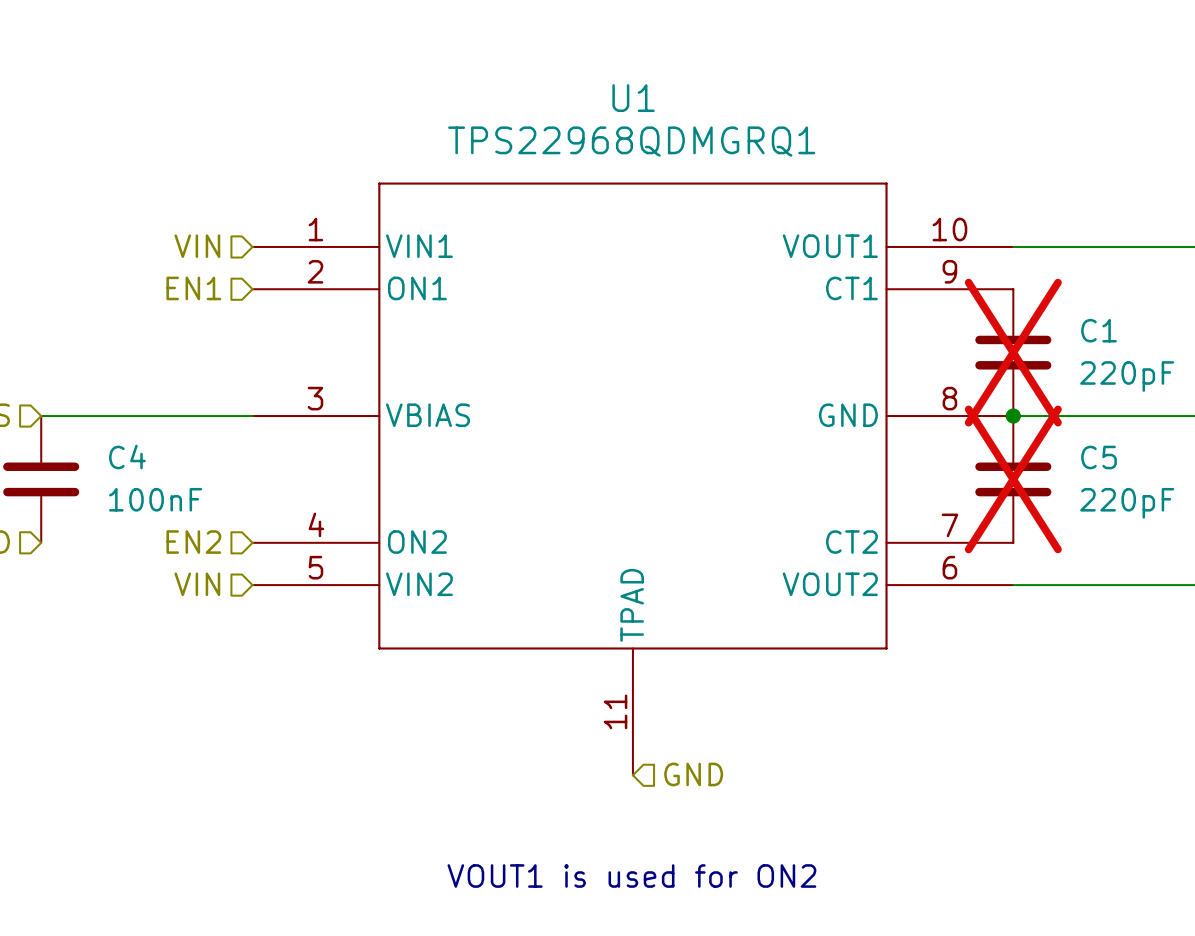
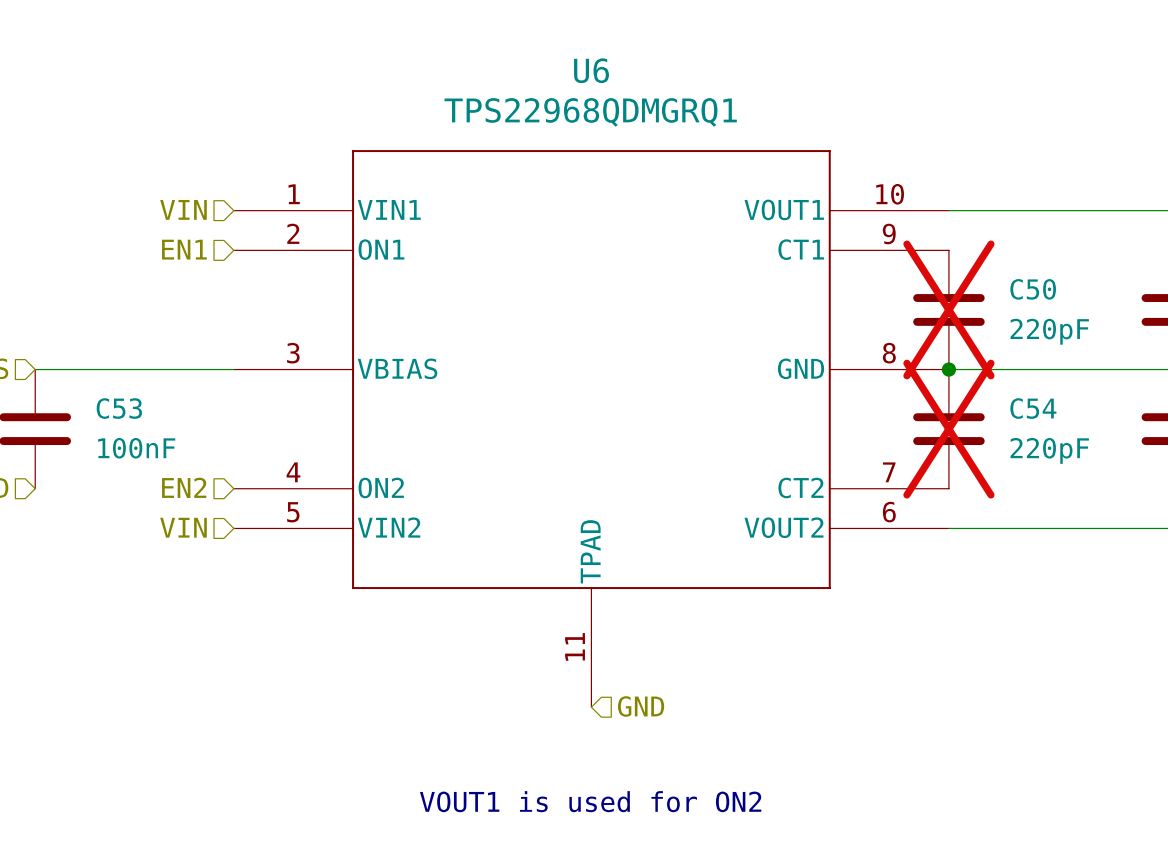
U1 name: U1 (633, 98) -> U6 (591, 70)
C1 name: C1 (1099, 330) -> C50 (1033, 289)
C4 name: C4 (127, 457) -> C53 (119, 408)
C5 name: C5 (1099, 457) -> C54 (1033, 408)

